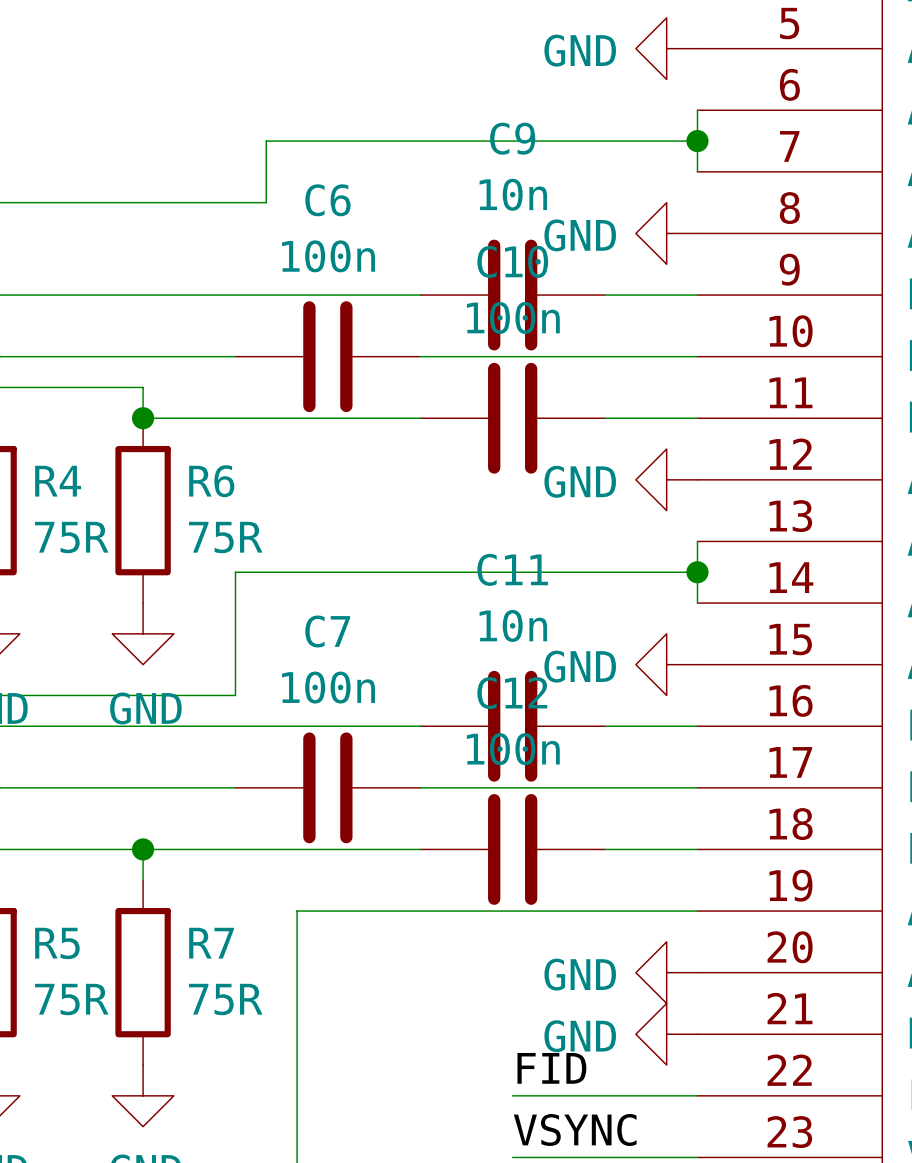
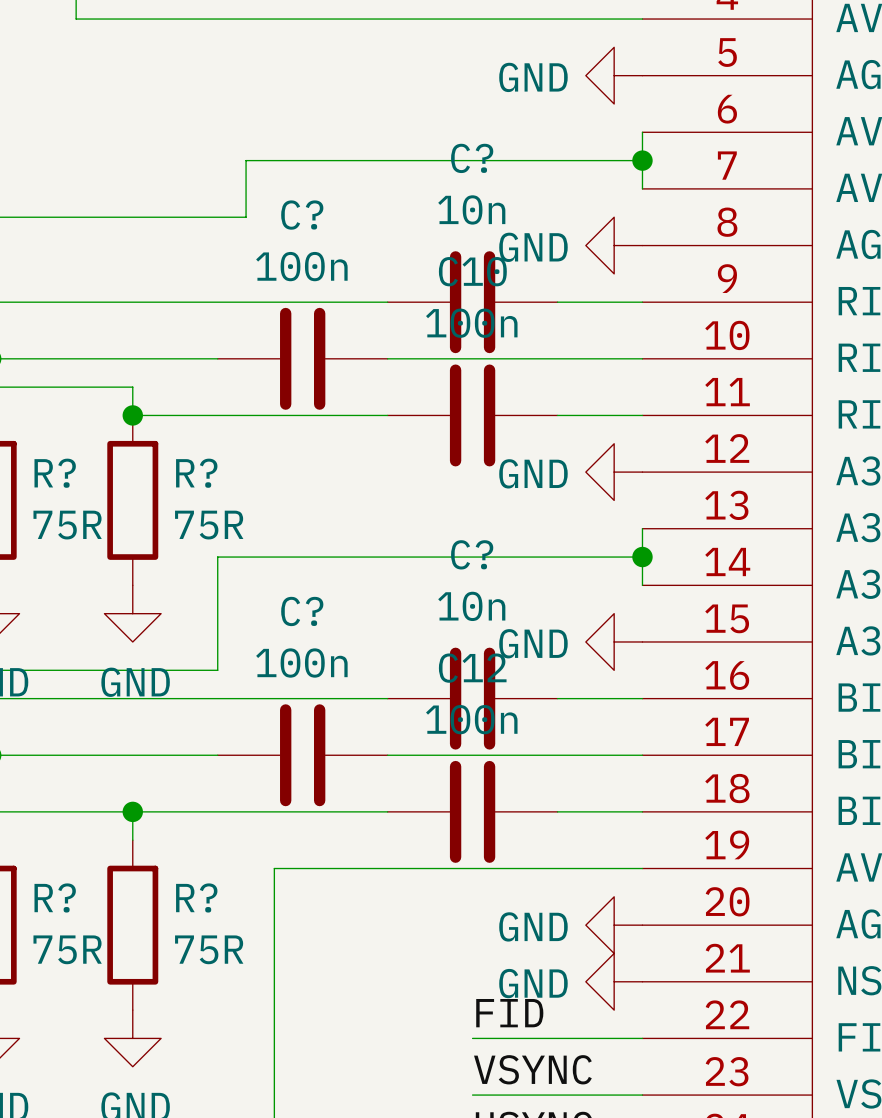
C9 name: C9 (512, 138) -> C? (472, 158)
C6 name: C6 (327, 200) -> C? (302, 215)
R4 name: R4 (58, 481) -> R? (55, 473)
R6 name: R6 (211, 481) -> R? (196, 473)
C11 name: C11 (512, 569) -> C? (472, 554)
C7 name: C7 (327, 631) -> C? (302, 611)
R5 name: R5 (57, 943) -> R? (55, 897)
R7 name: R7 (211, 943) -> R? (196, 897)

